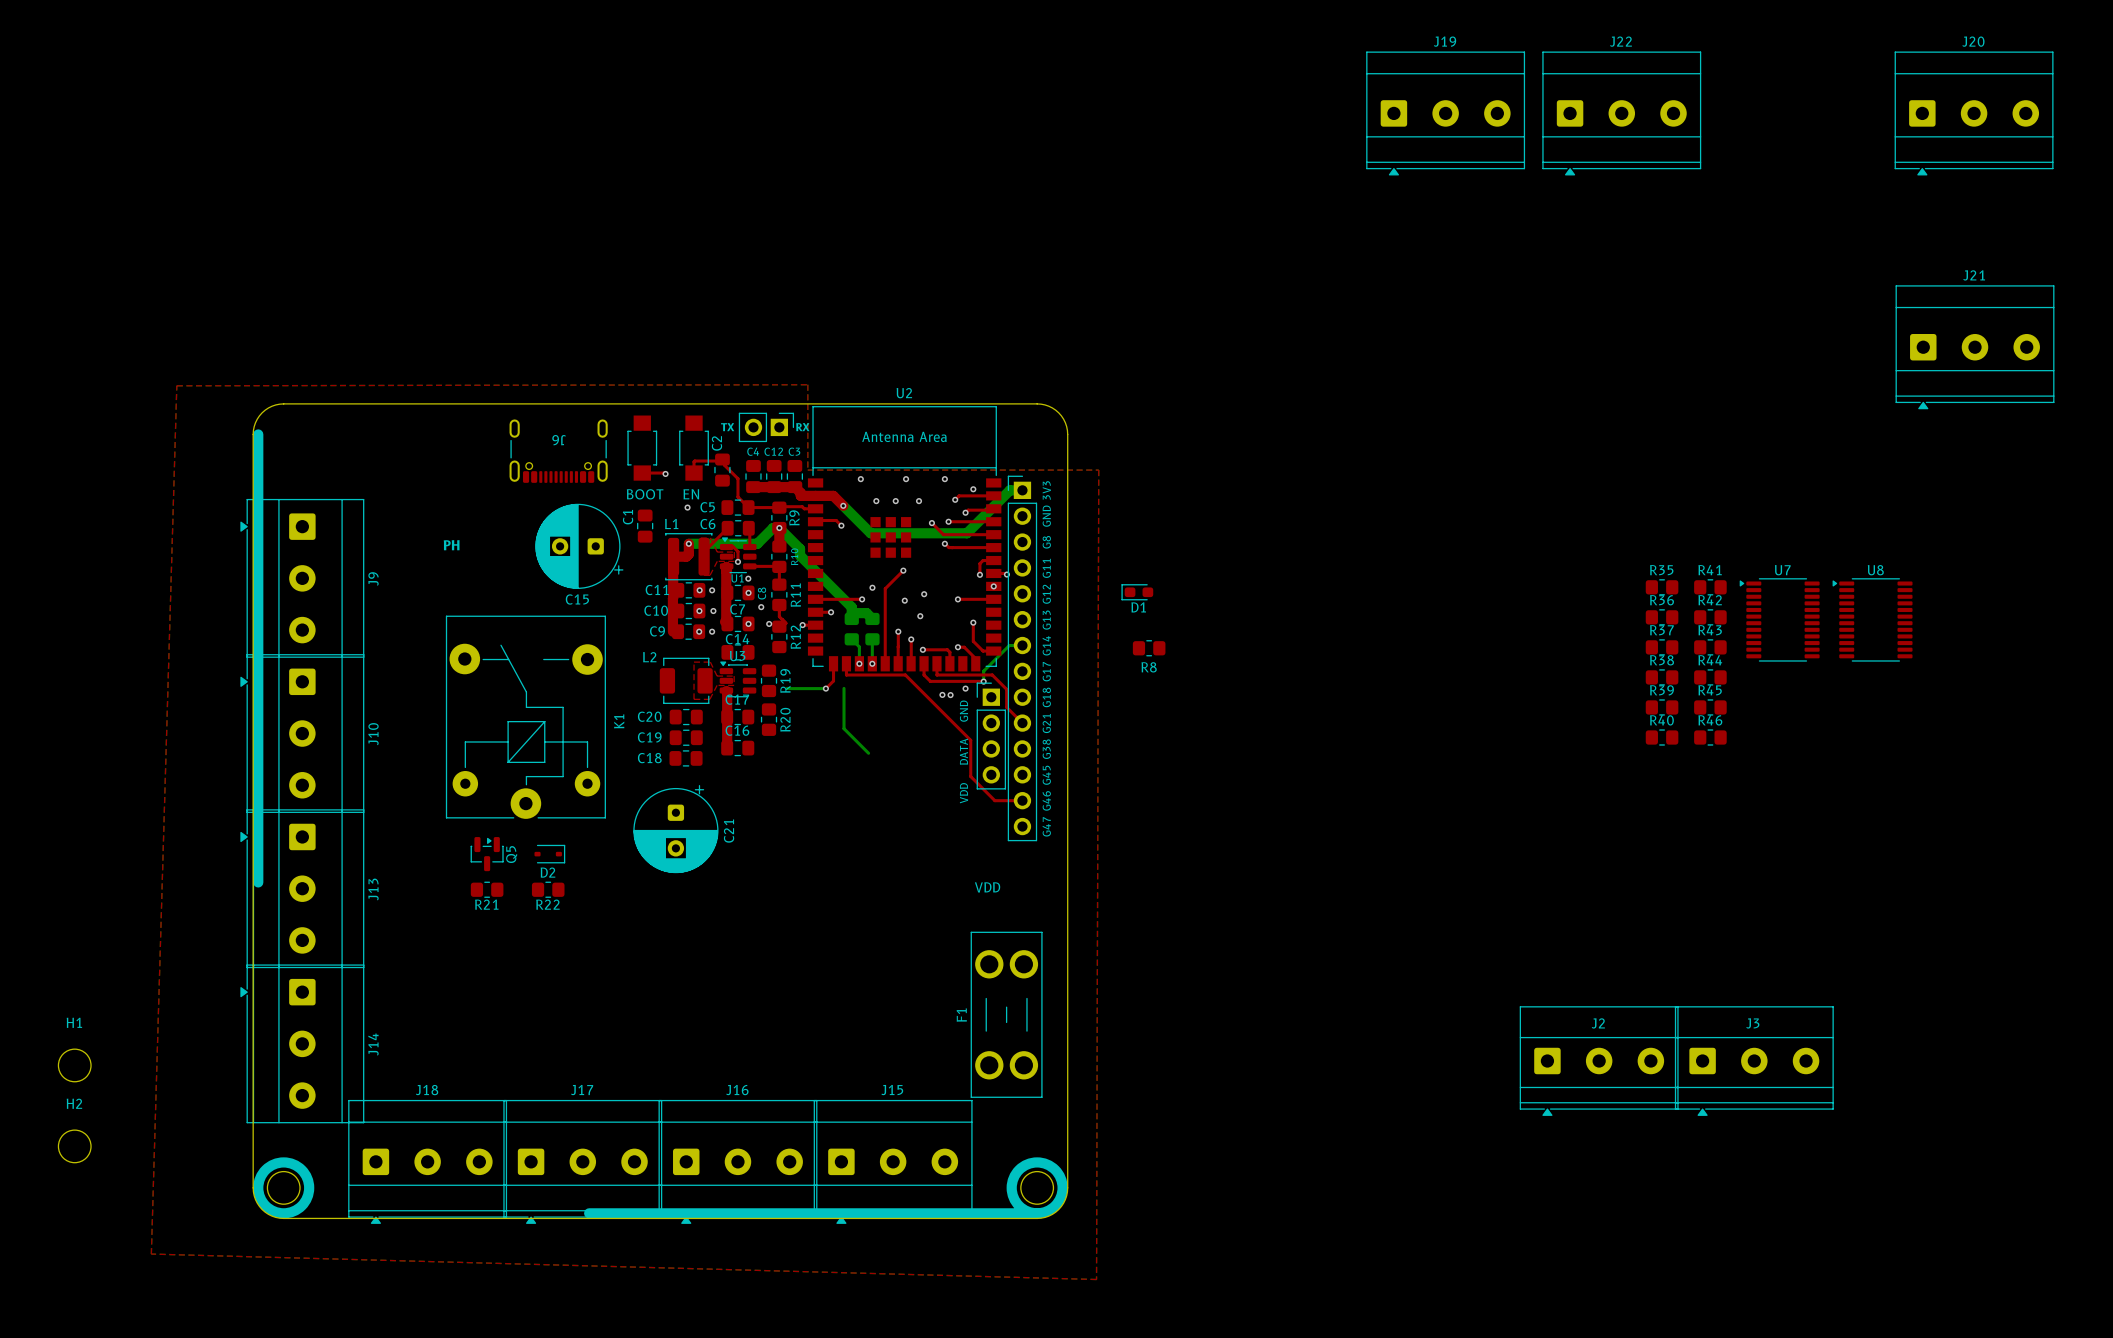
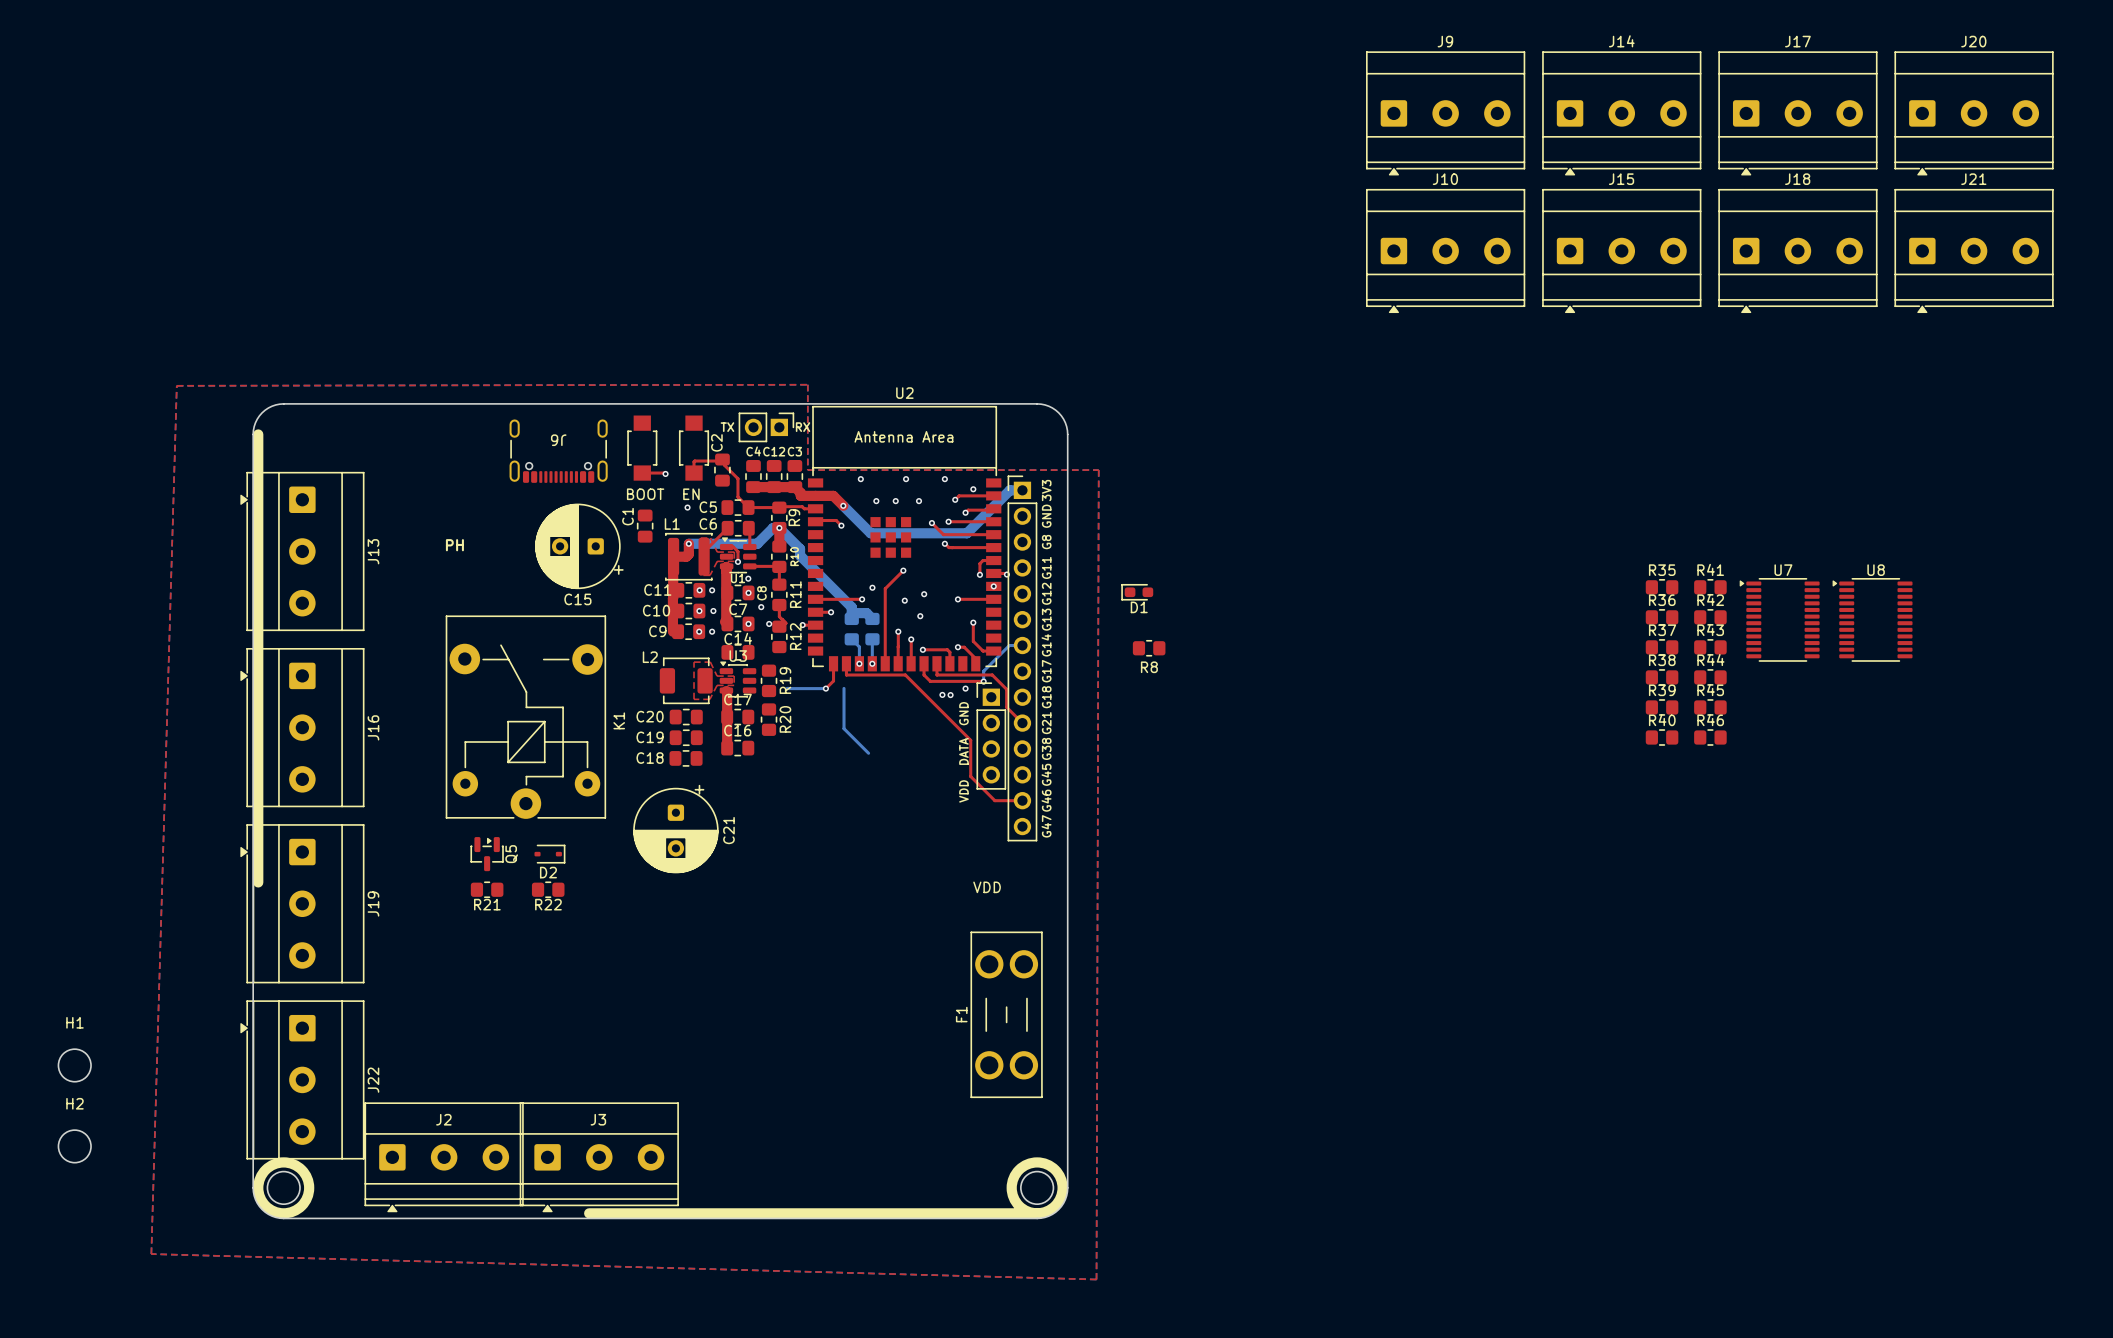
J19 name: J19 (1445, 41) -> J9 (1445, 41)
J22 name: J22 (1620, 41) -> J14 (1621, 41)
J21 position: (1975, 347) -> (1974, 251)
J9: (302, 578) -> none
J10 rotation: 0° (302, 733) -> 90° counterclockwise (1445, 251)
J10 position: (302, 733) -> (1445, 251)
J13 position: (302, 888) -> (302, 551)
J19: none -> (302, 903)
J14: (302, 1043) -> none
J2 position: (1599, 1061) -> (444, 1157)
J3 position: (1754, 1061) -> (599, 1157)
J22: none -> (302, 1079)
J18 position: (427, 1161) -> (1797, 251)
J17 position: (582, 1161) -> (1797, 113)
J16 rotation: 0° (737, 1161) -> 90° clockwise (302, 727)
J16 position: (737, 1161) -> (302, 727)
J15 position: (893, 1161) -> (1621, 251)

